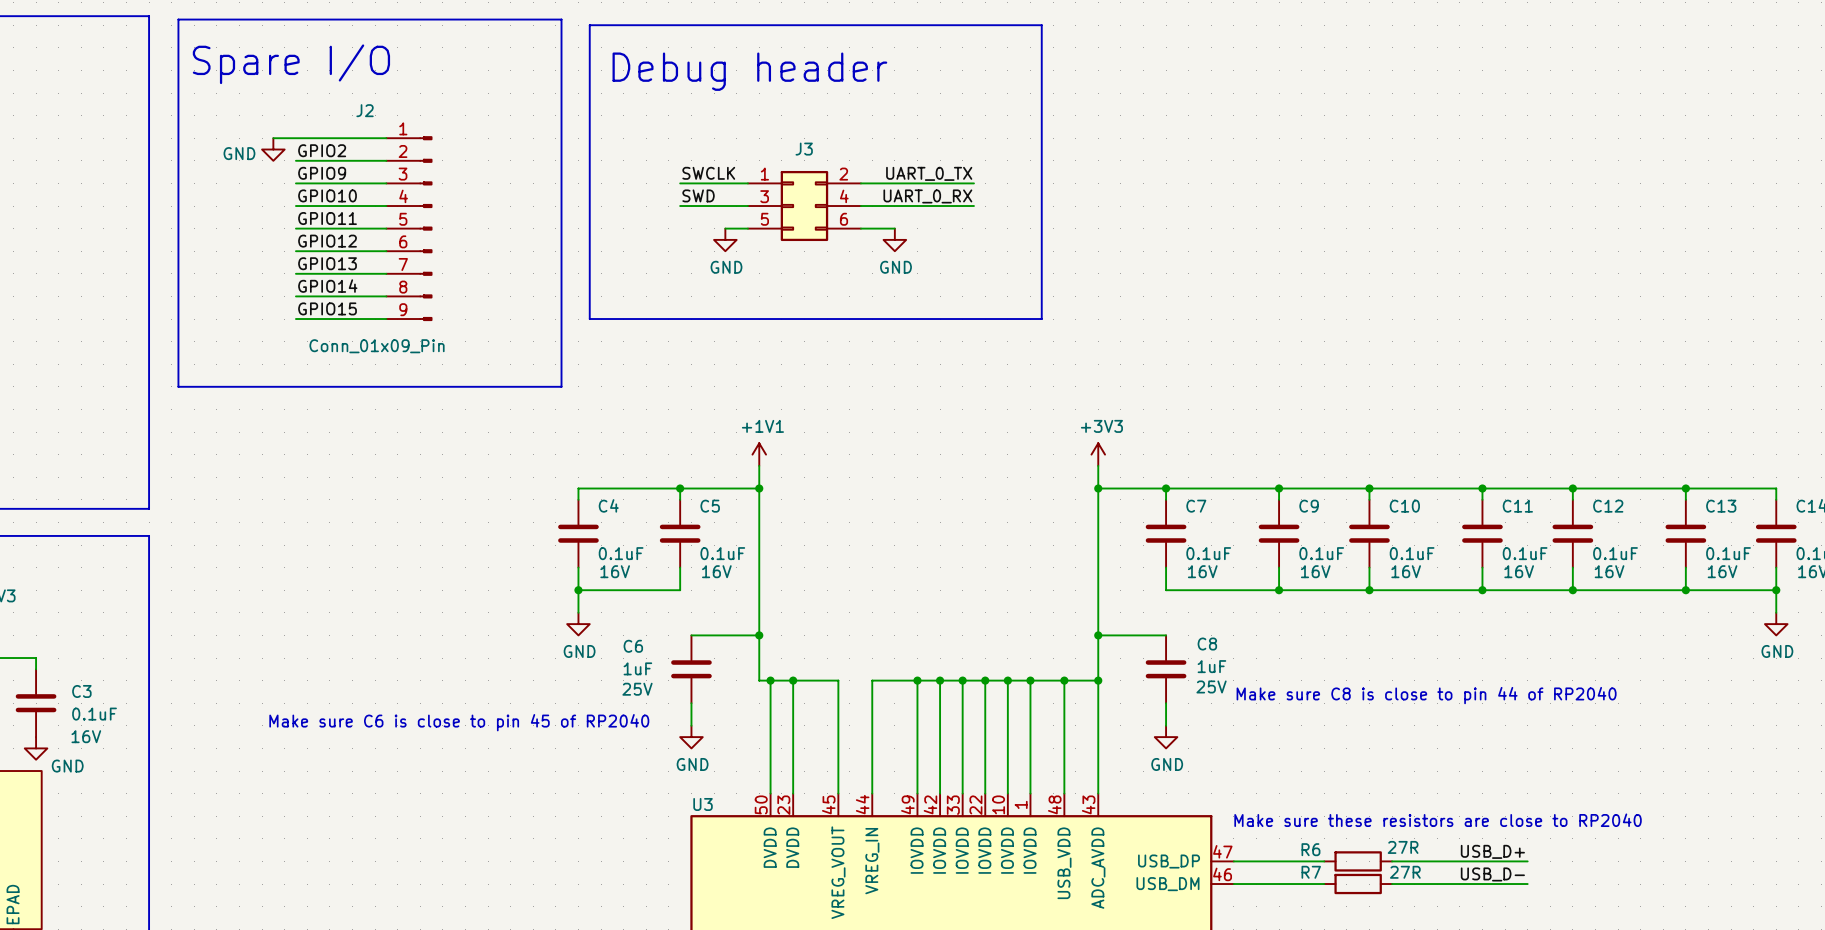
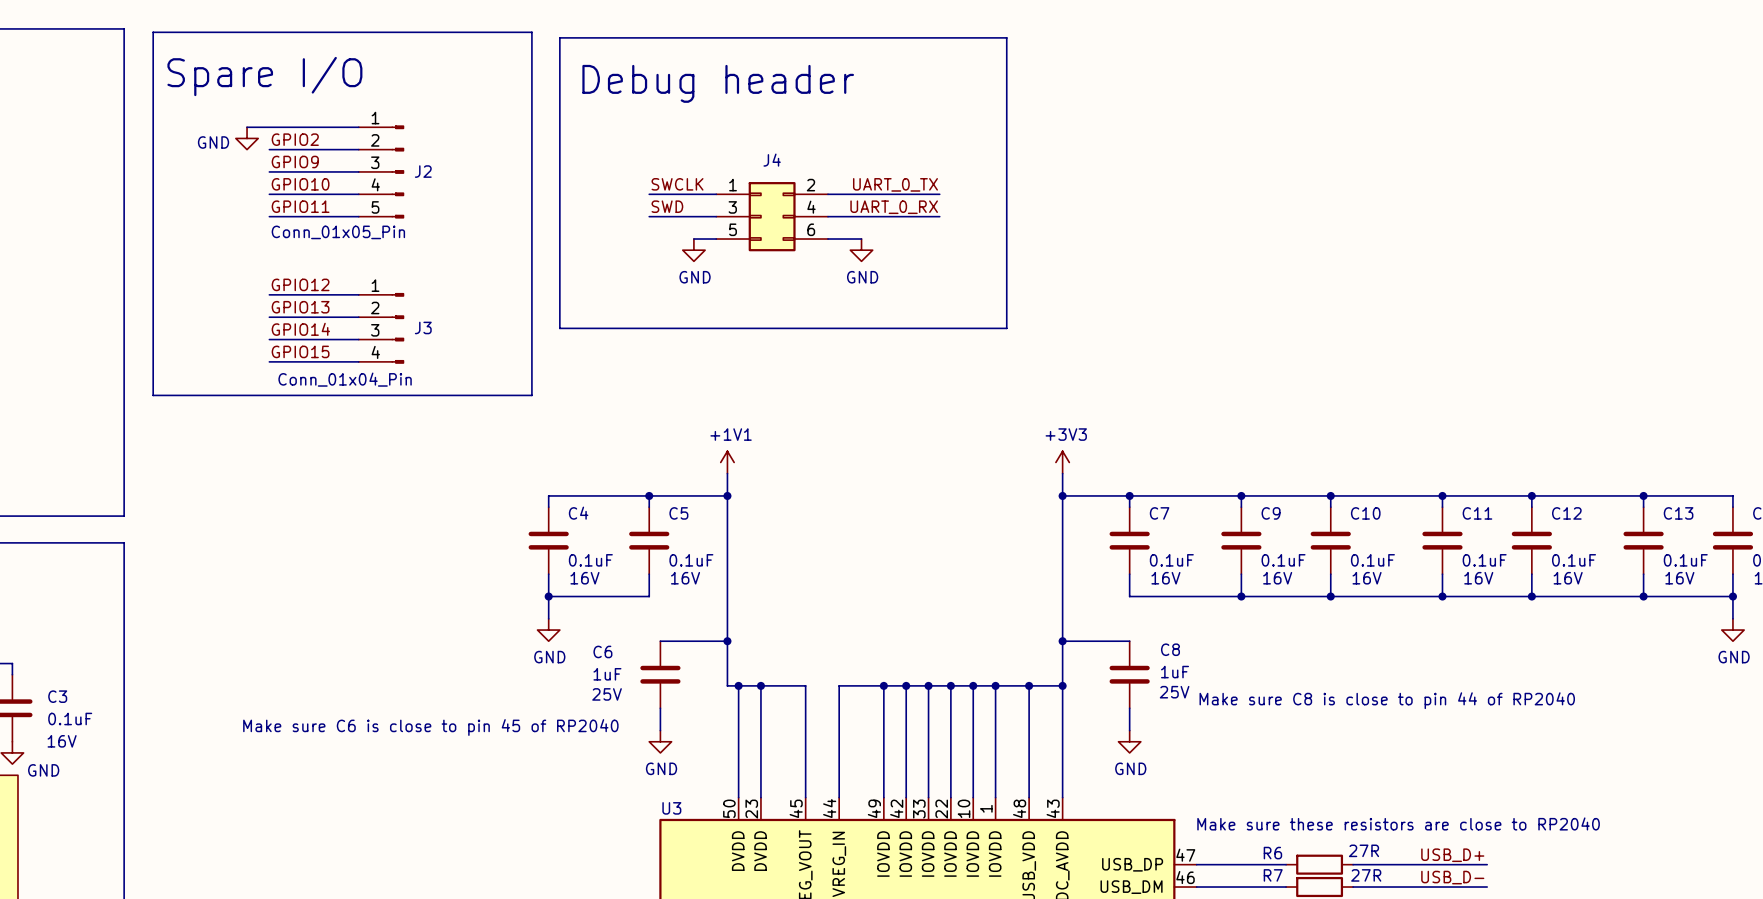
J2 name position: J2 (365, 110) -> J2 (423, 171)
wire: none -> (247, 127) (358, 127)
label: none -> GPIO2 (295, 139)
J2 symbol: [386, 136, 433, 321] -> [358, 125, 405, 219]
wire: (273, 138) (295, 138) -> none
power symbol position: GND (273, 149) -> GND (247, 138)
J3 name: J3 (804, 149) -> J4 (772, 160)
label: GPIO2 (322, 150) -> GPIO9 (295, 162)
label: GPIO9 (322, 173) -> GPIO10 (300, 184)
label: GPIO10 (327, 195) -> GPIO11 (300, 206)
label: GPIO11 (327, 218) -> none
wire: (295, 228) (386, 228) -> none
label position: GPIO12 (327, 241) -> GPIO12 (300, 284)
wire: (295, 251) (386, 251) -> (269, 294) (358, 294)
label position: GPIO13 (327, 263) -> GPIO13 (300, 307)
wire: (295, 273) (386, 273) -> (269, 317) (358, 317)
label position: GPIO14 (327, 286) -> GPIO14 (300, 329)
wire: (295, 296) (386, 296) -> (269, 339) (358, 339)
label position: GPIO15 (327, 308) -> GPIO15 (300, 351)
wire: (295, 319) (386, 319) -> (269, 361) (358, 361)
J3: none -> Conn_01x04_Pin (381, 328)
J2 value: Conn_01x09_Pin (377, 346) -> Conn_01x05_Pin (338, 232)

